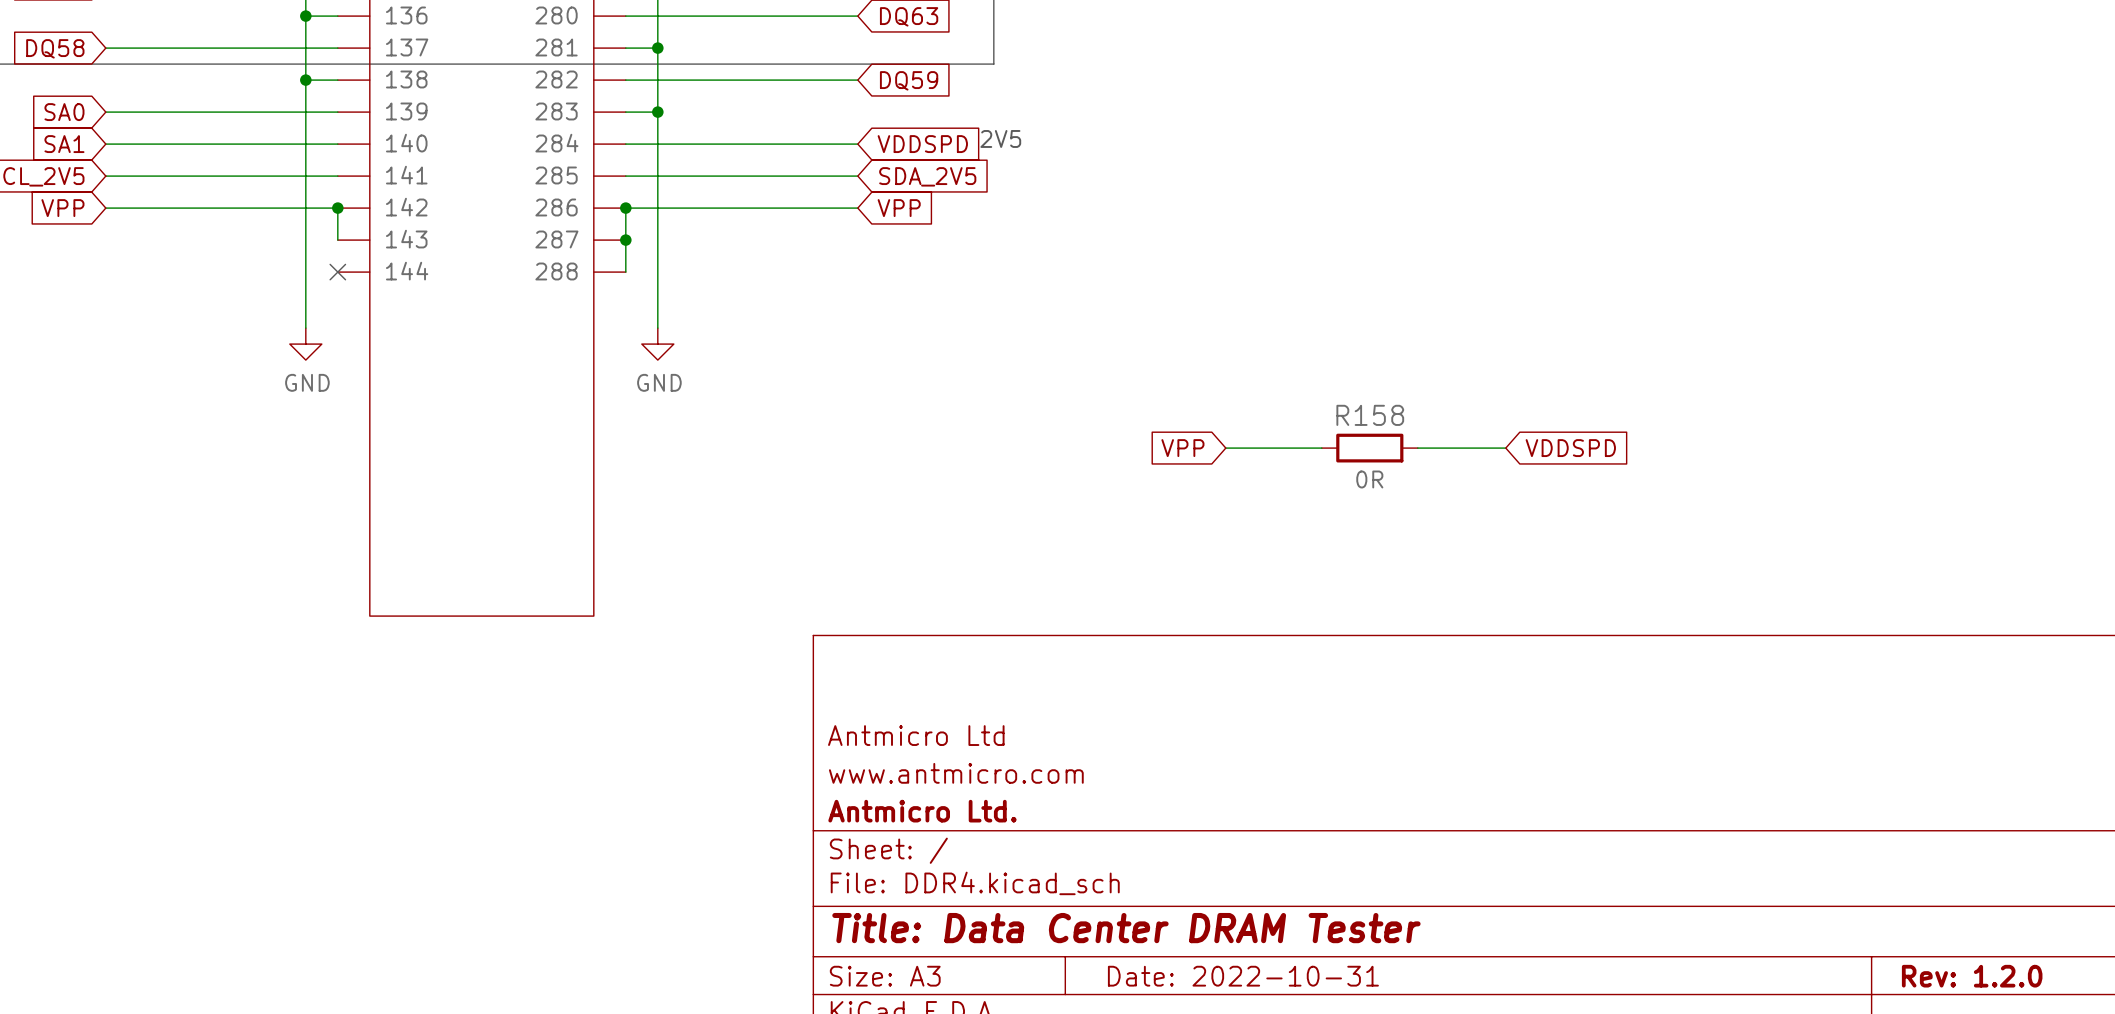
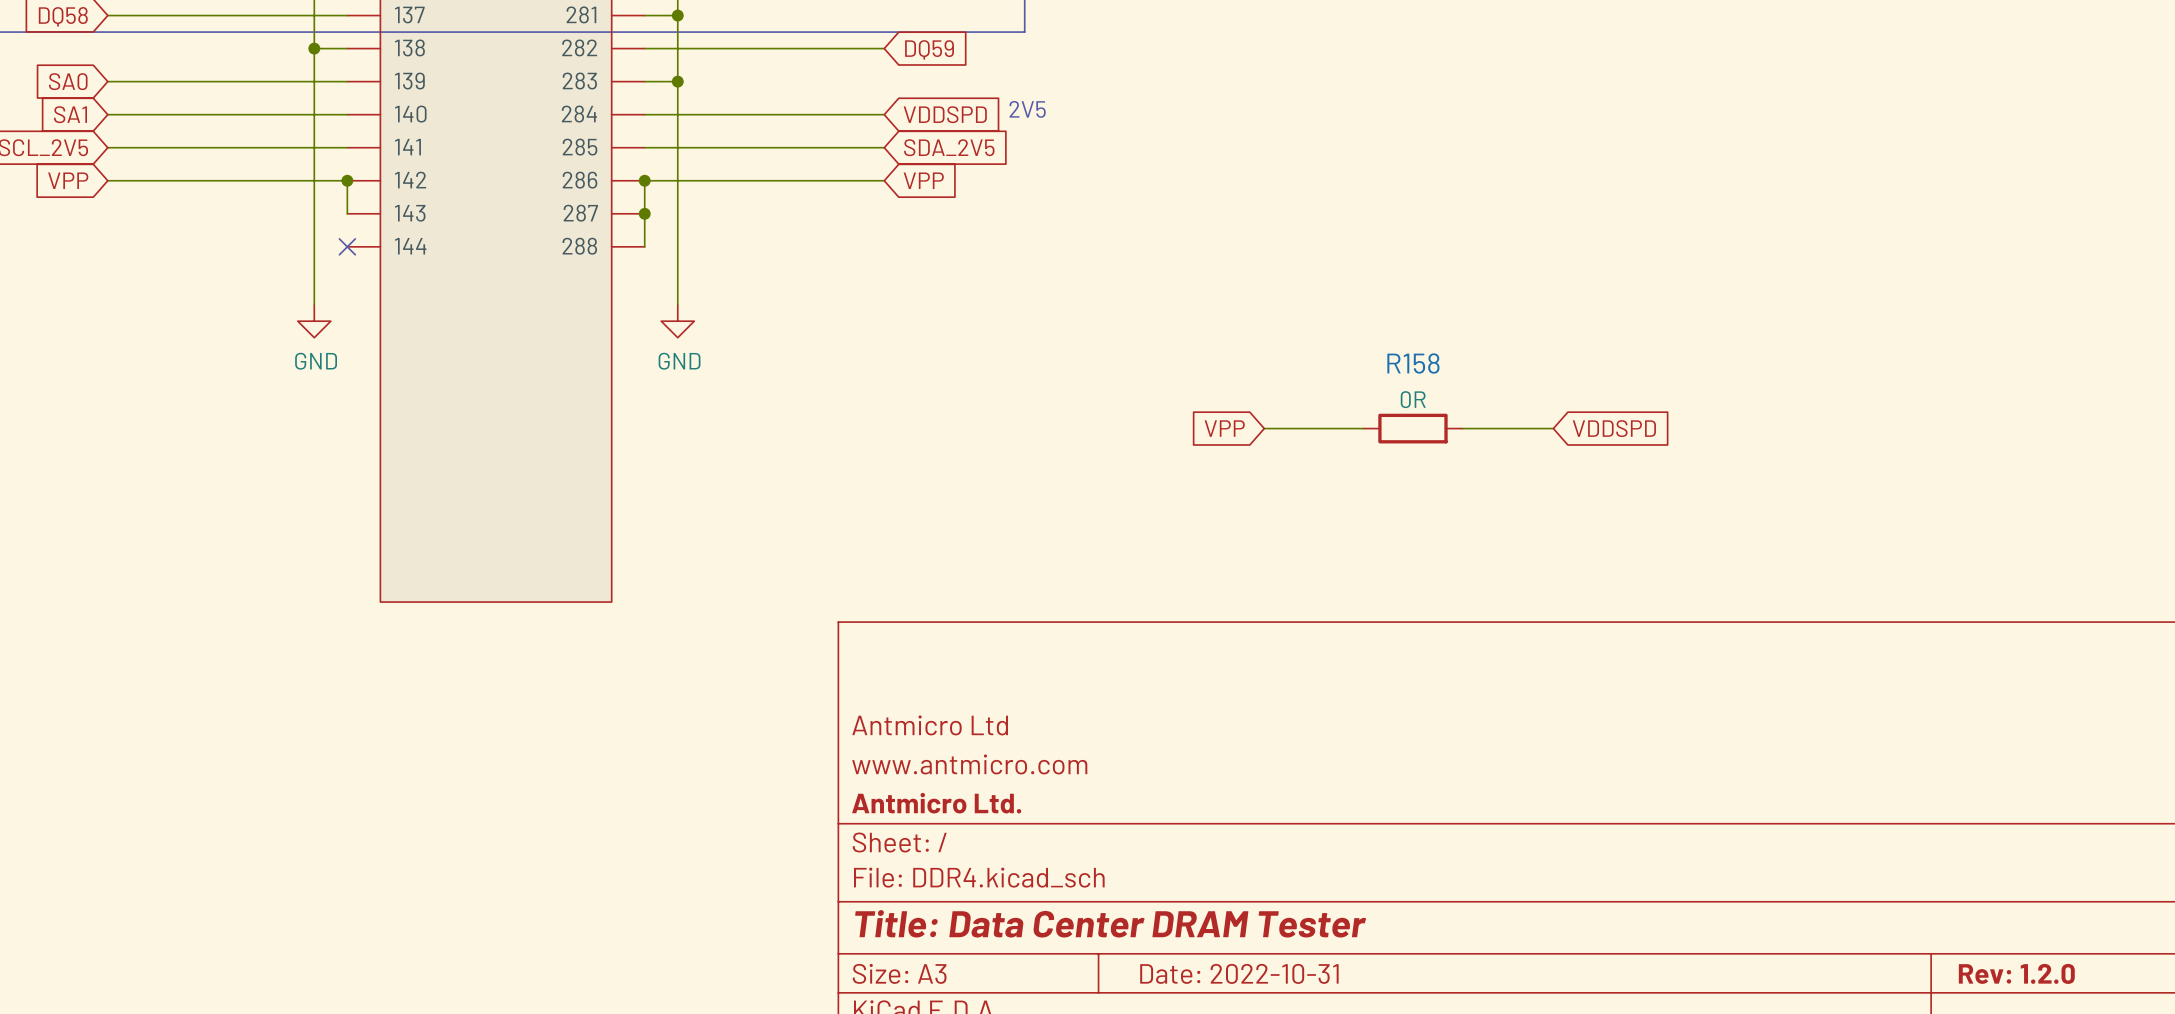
R158 name position: R158 (1370, 415) -> R158 (1413, 363)
R158 text position: 0R (1369, 479) -> 0R (1413, 399)

